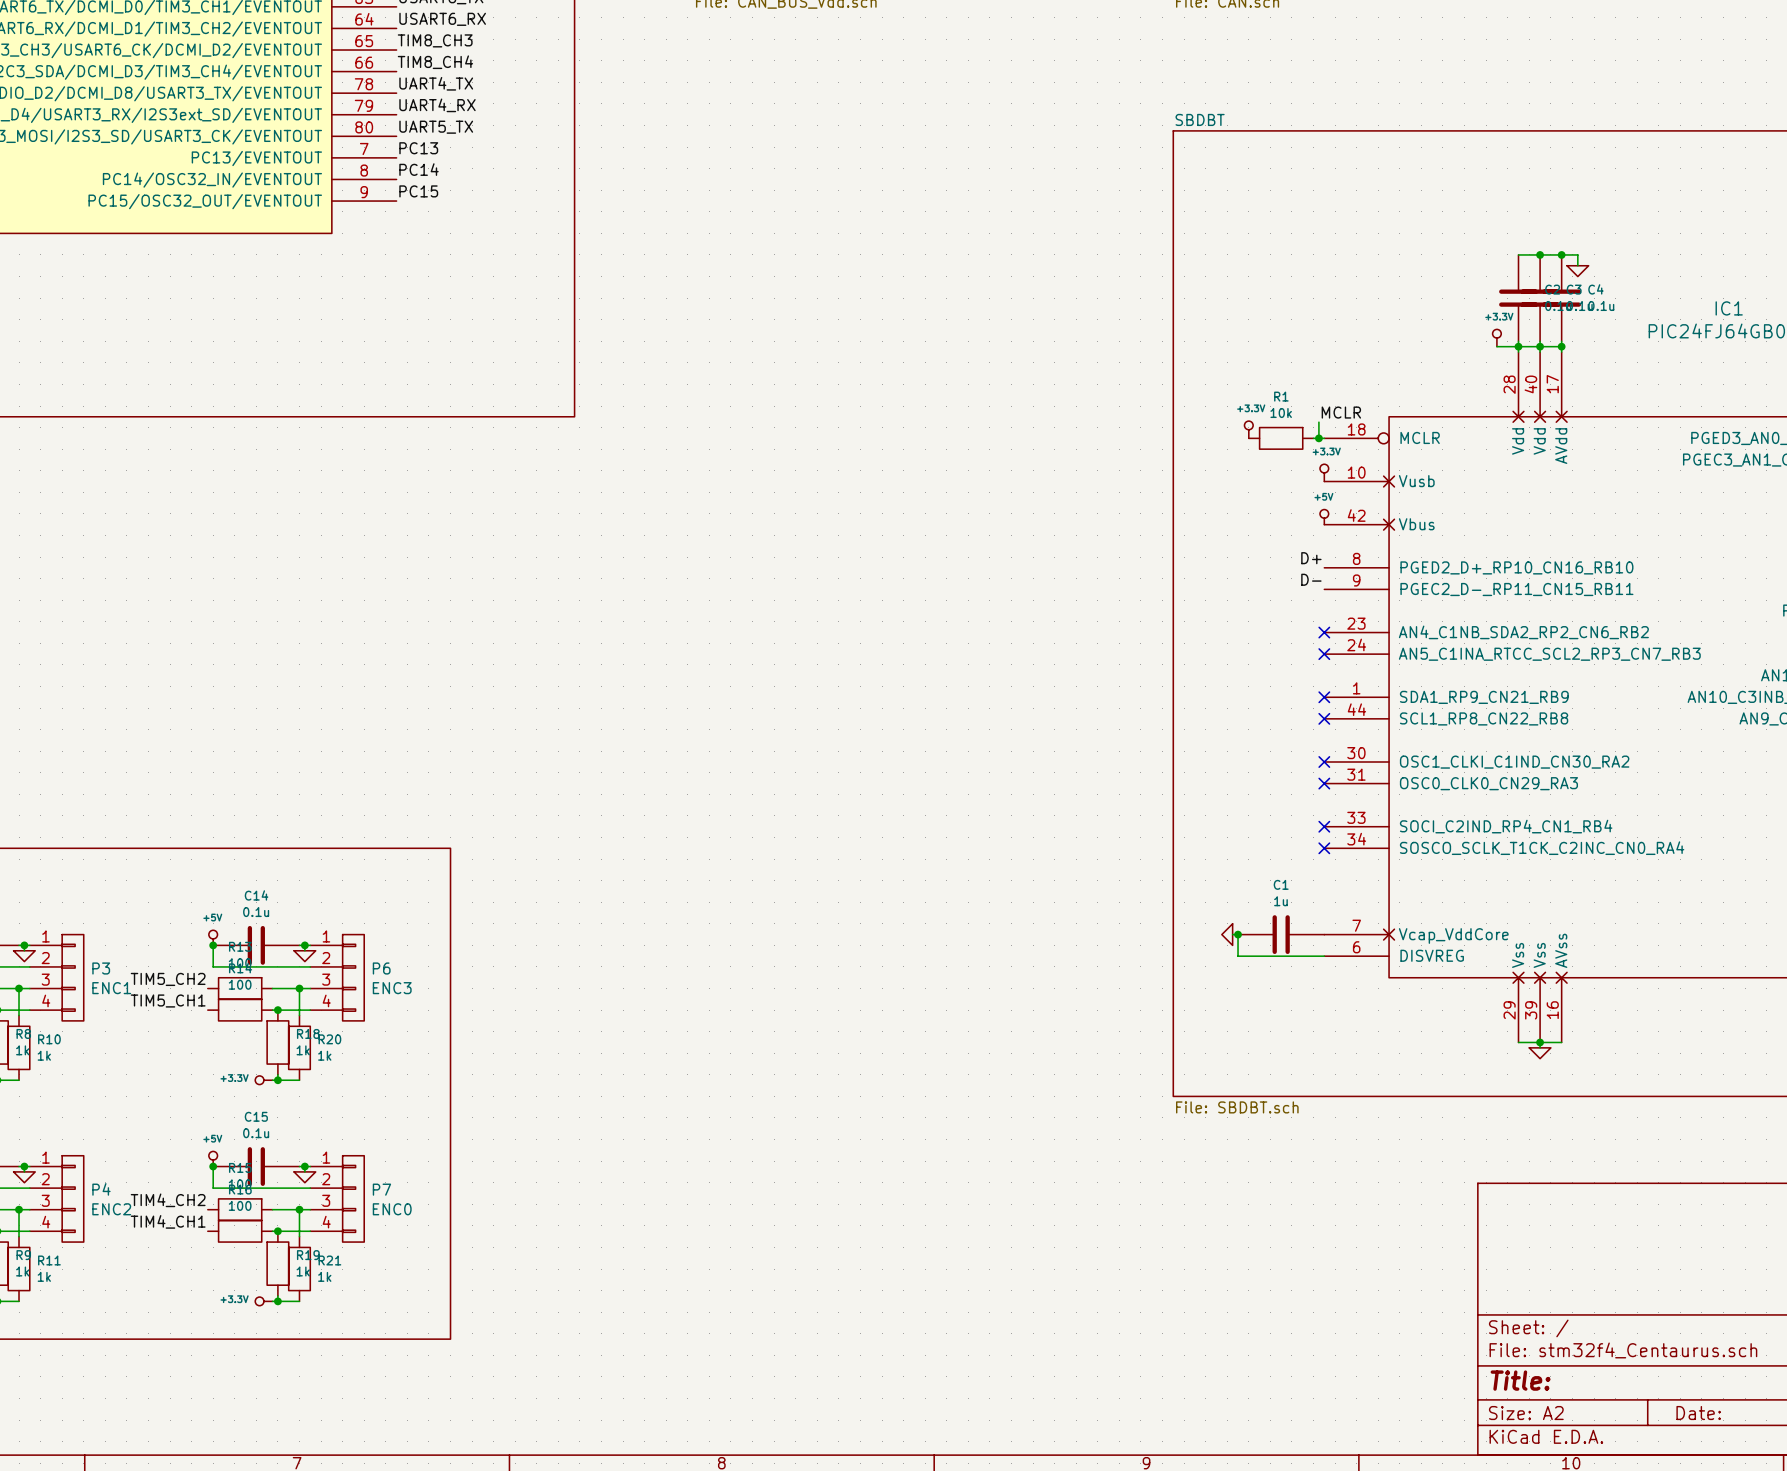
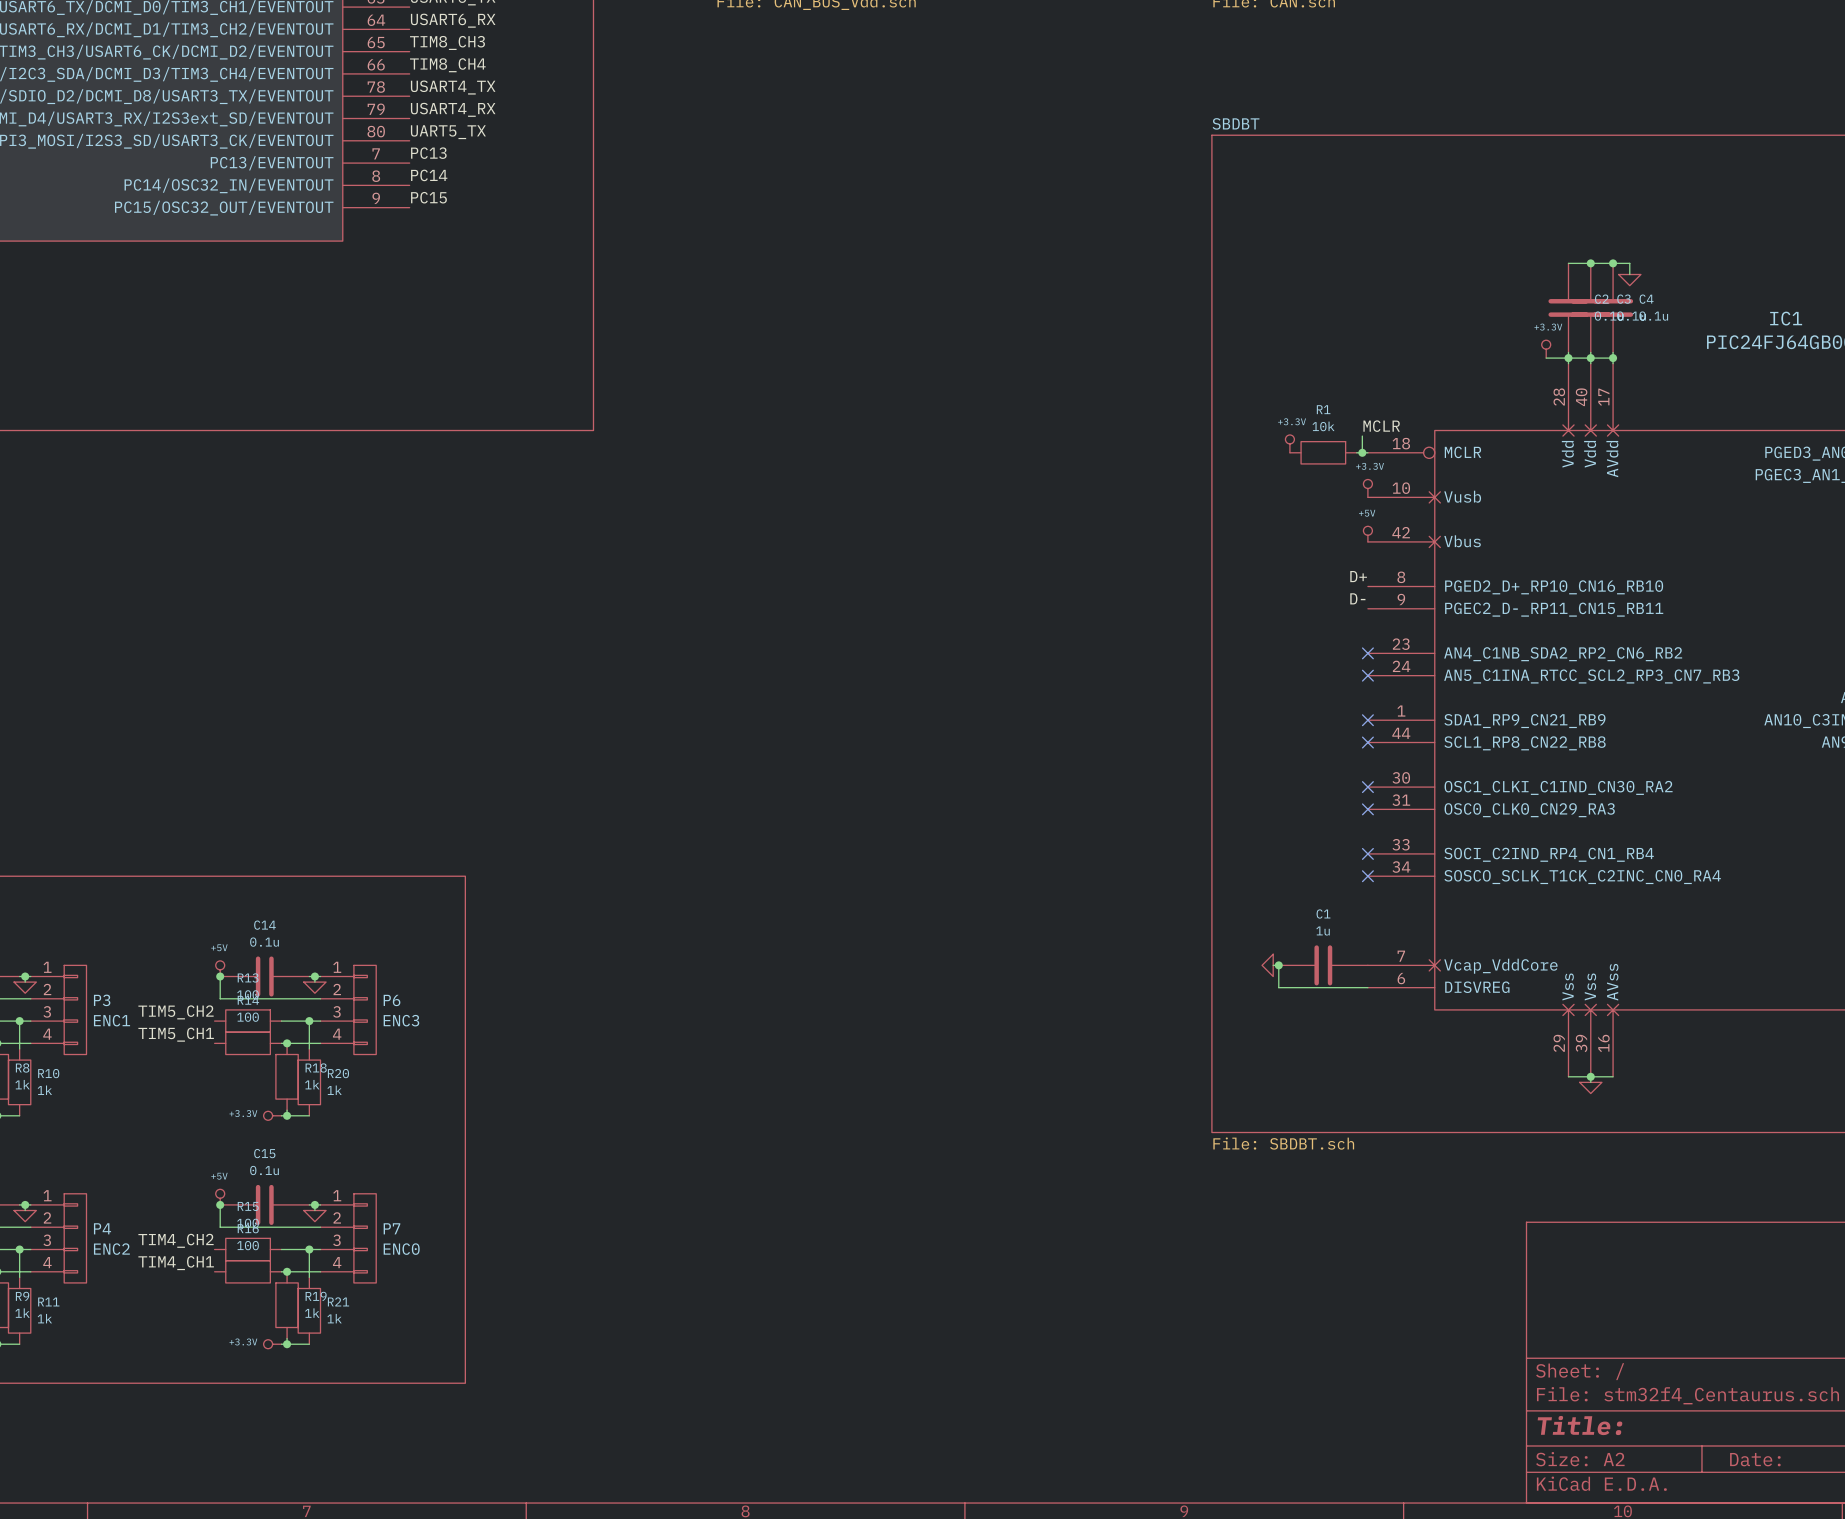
label: UART4_TX (436, 83) -> USART4_TX (453, 87)
label: UART4_RX (437, 105) -> USART4_RX (453, 109)

